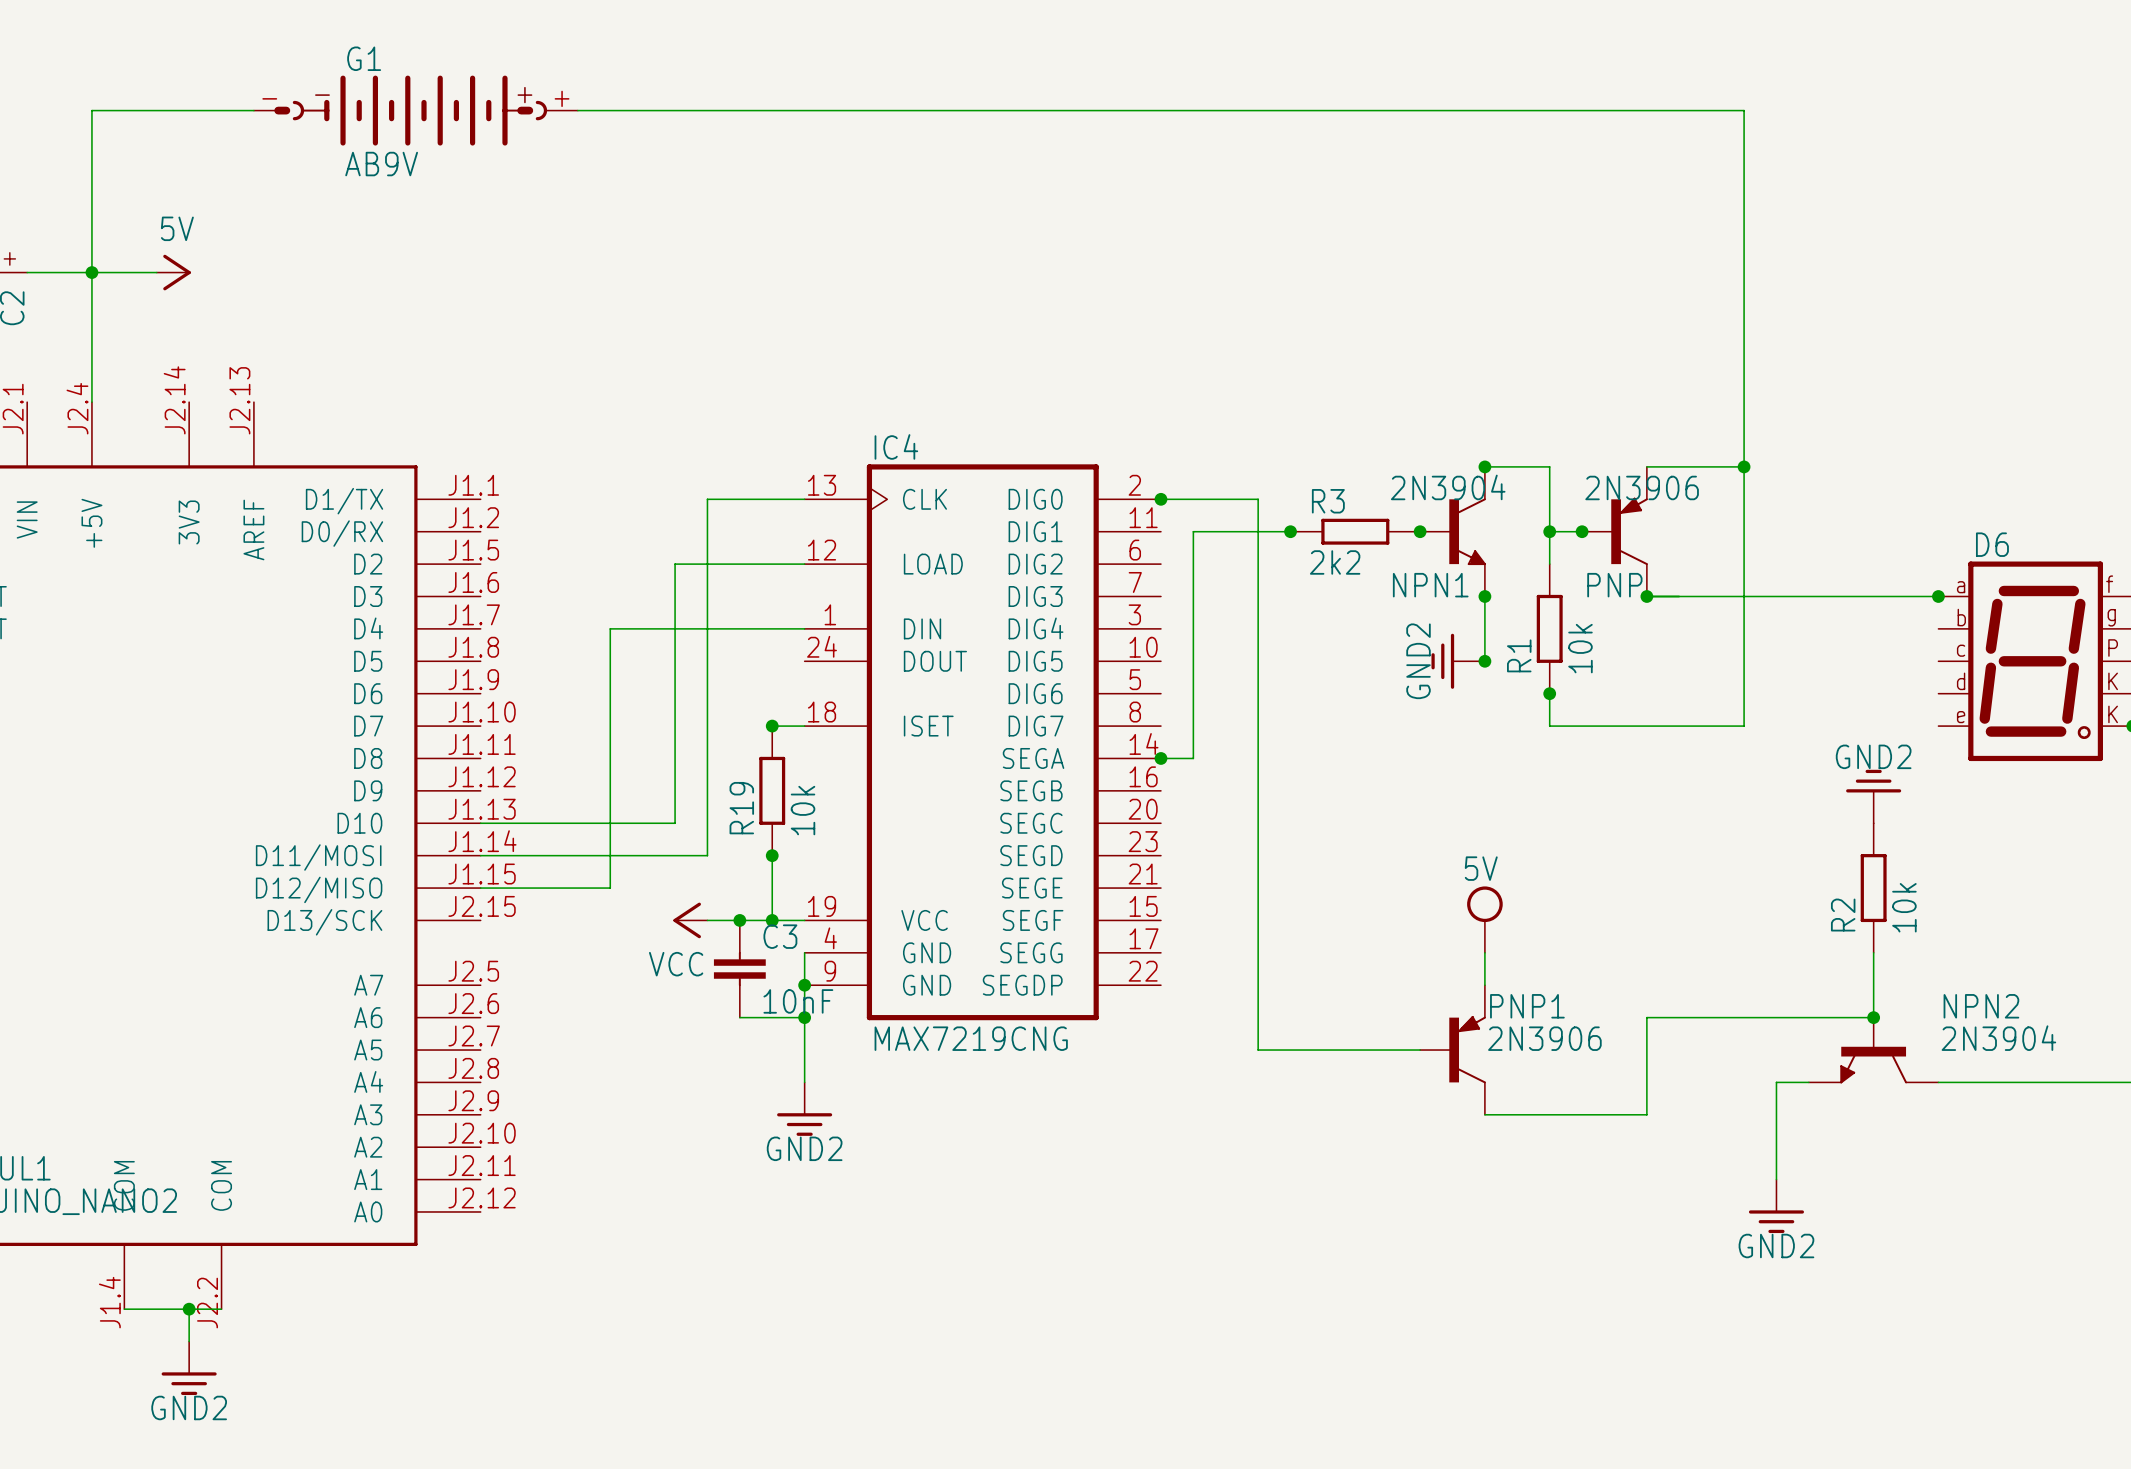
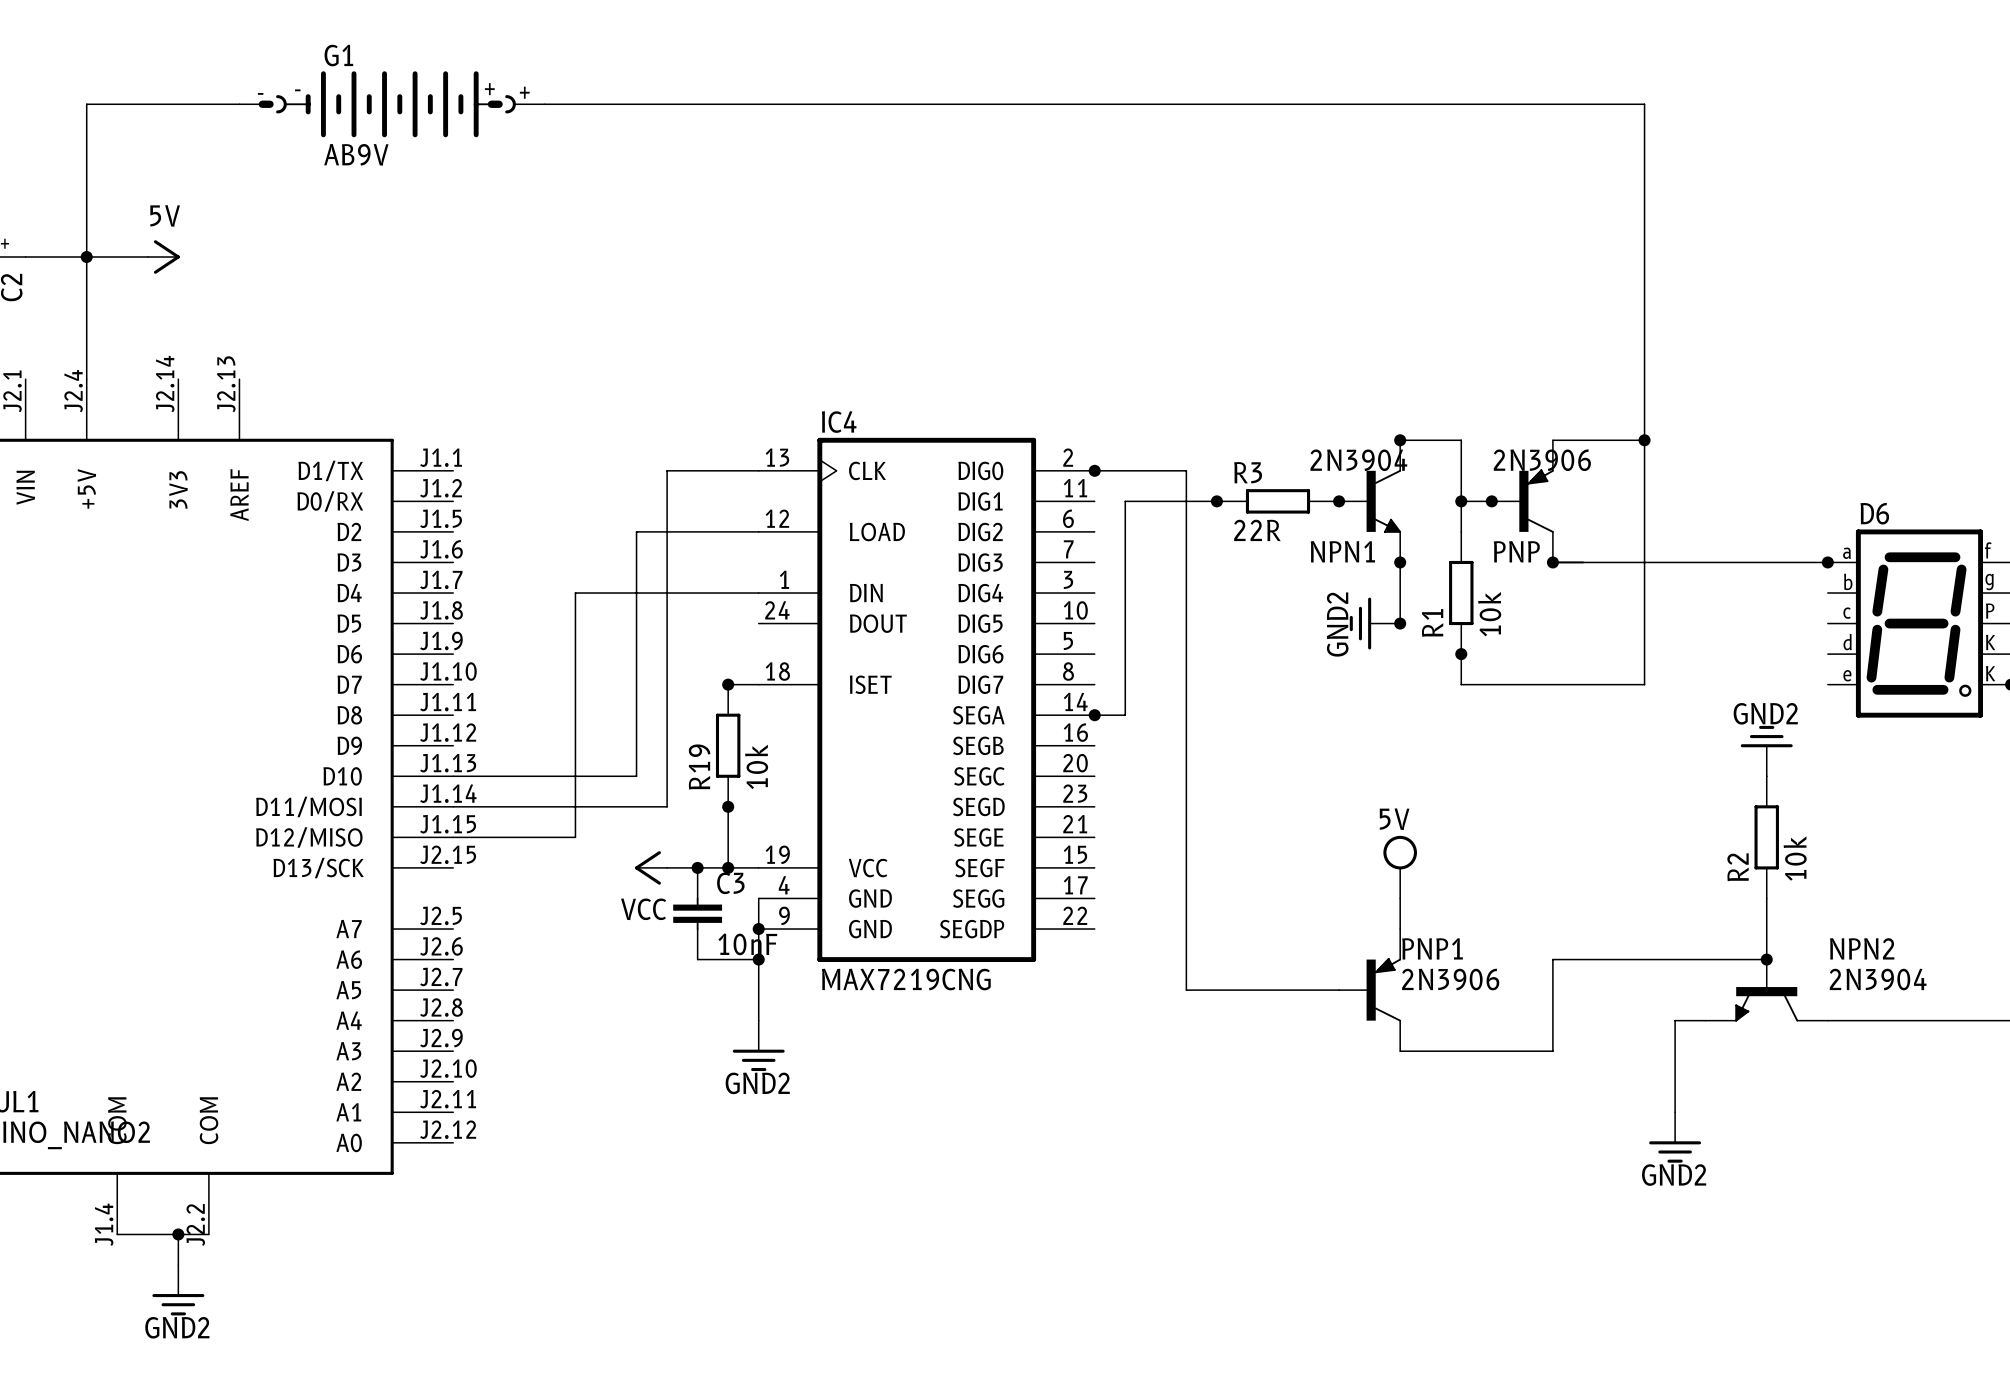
R3 value: 2k2 (1335, 562) -> 22R (1257, 530)

